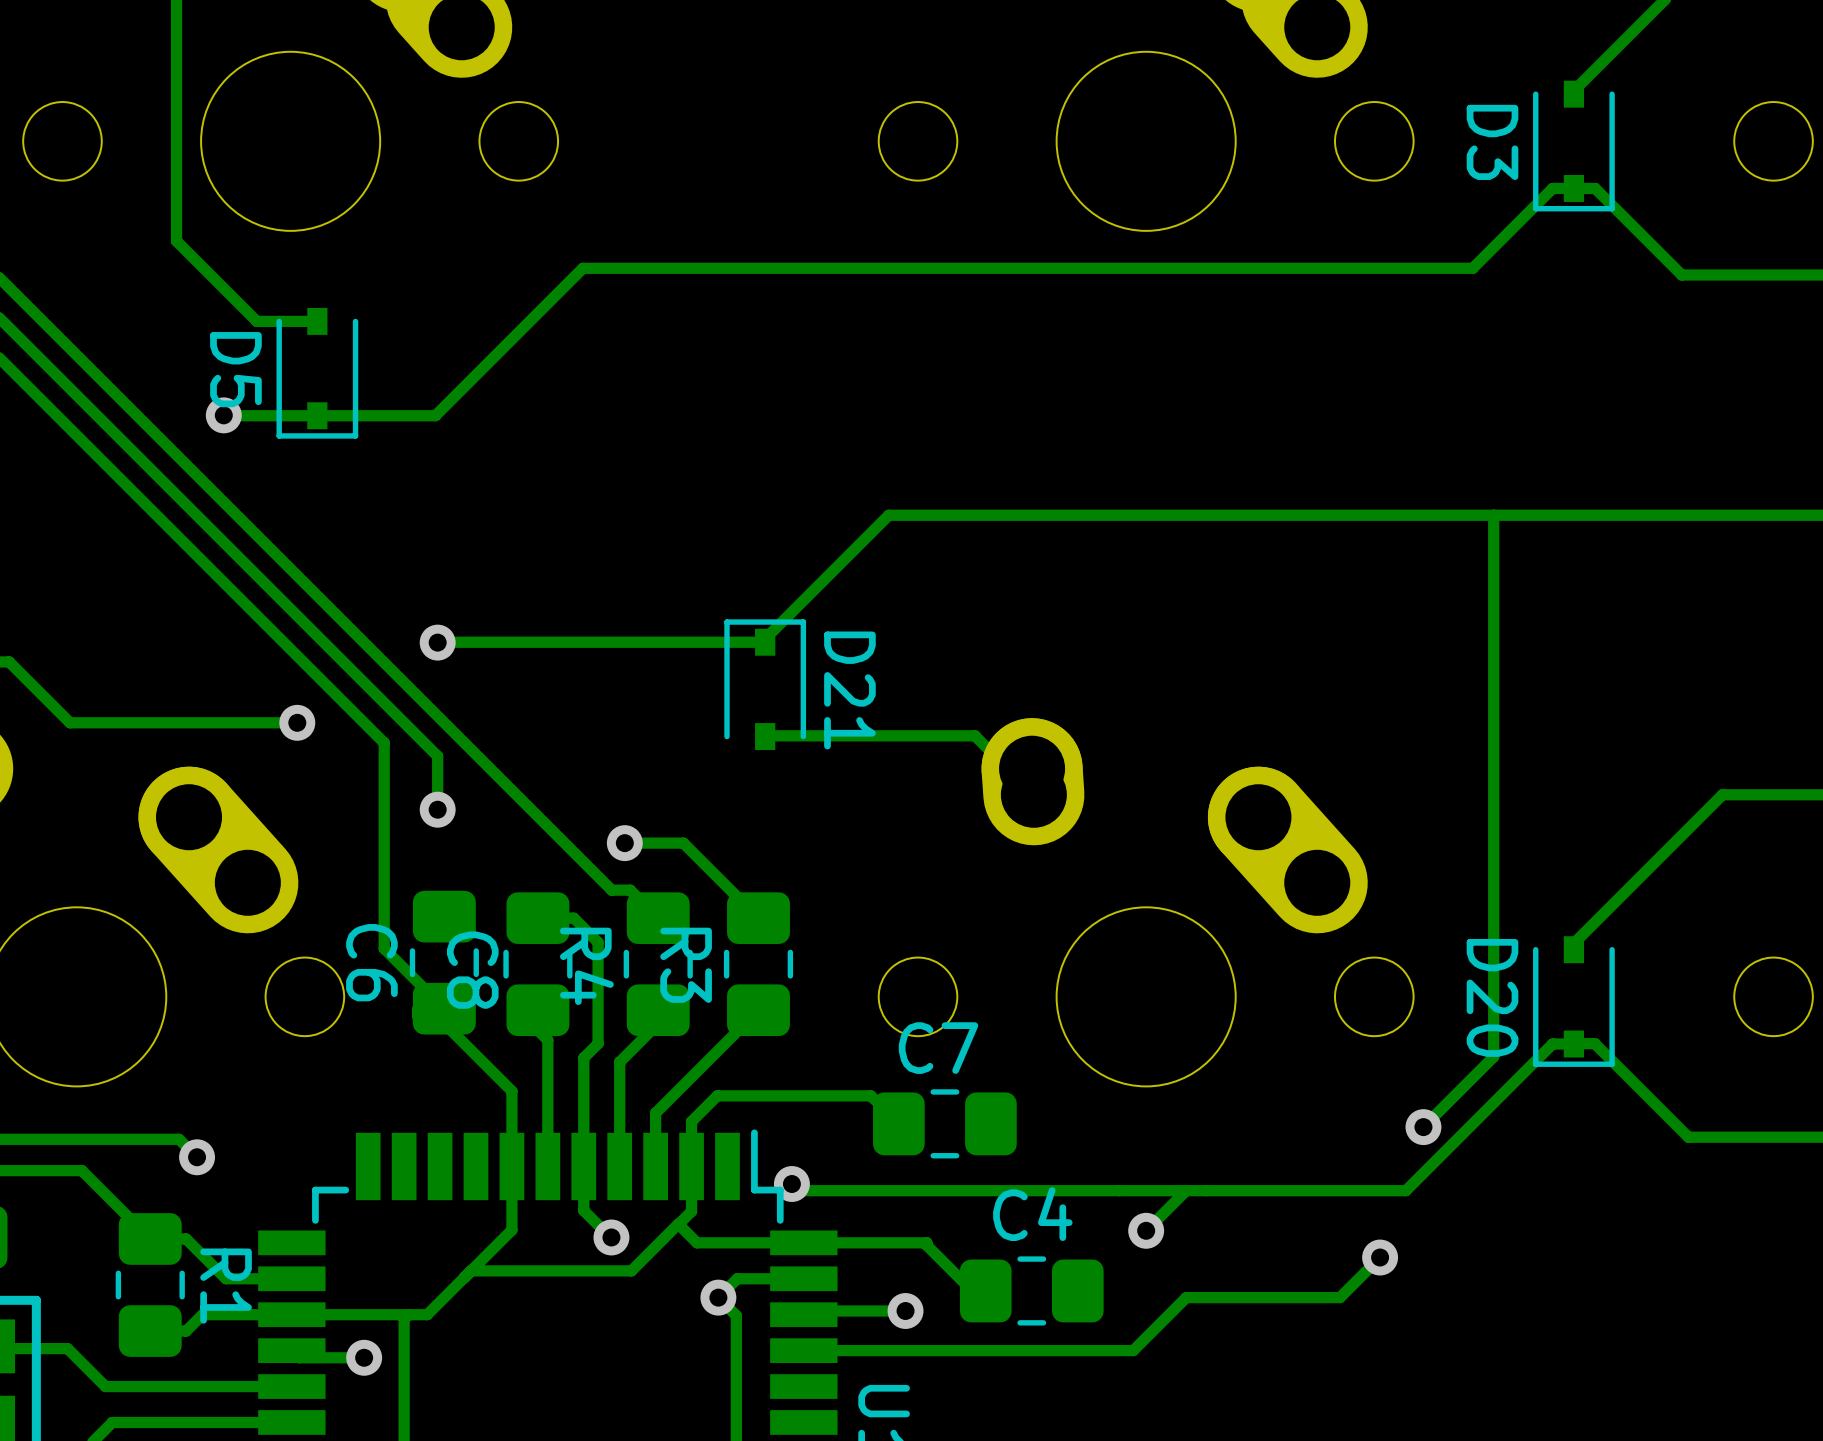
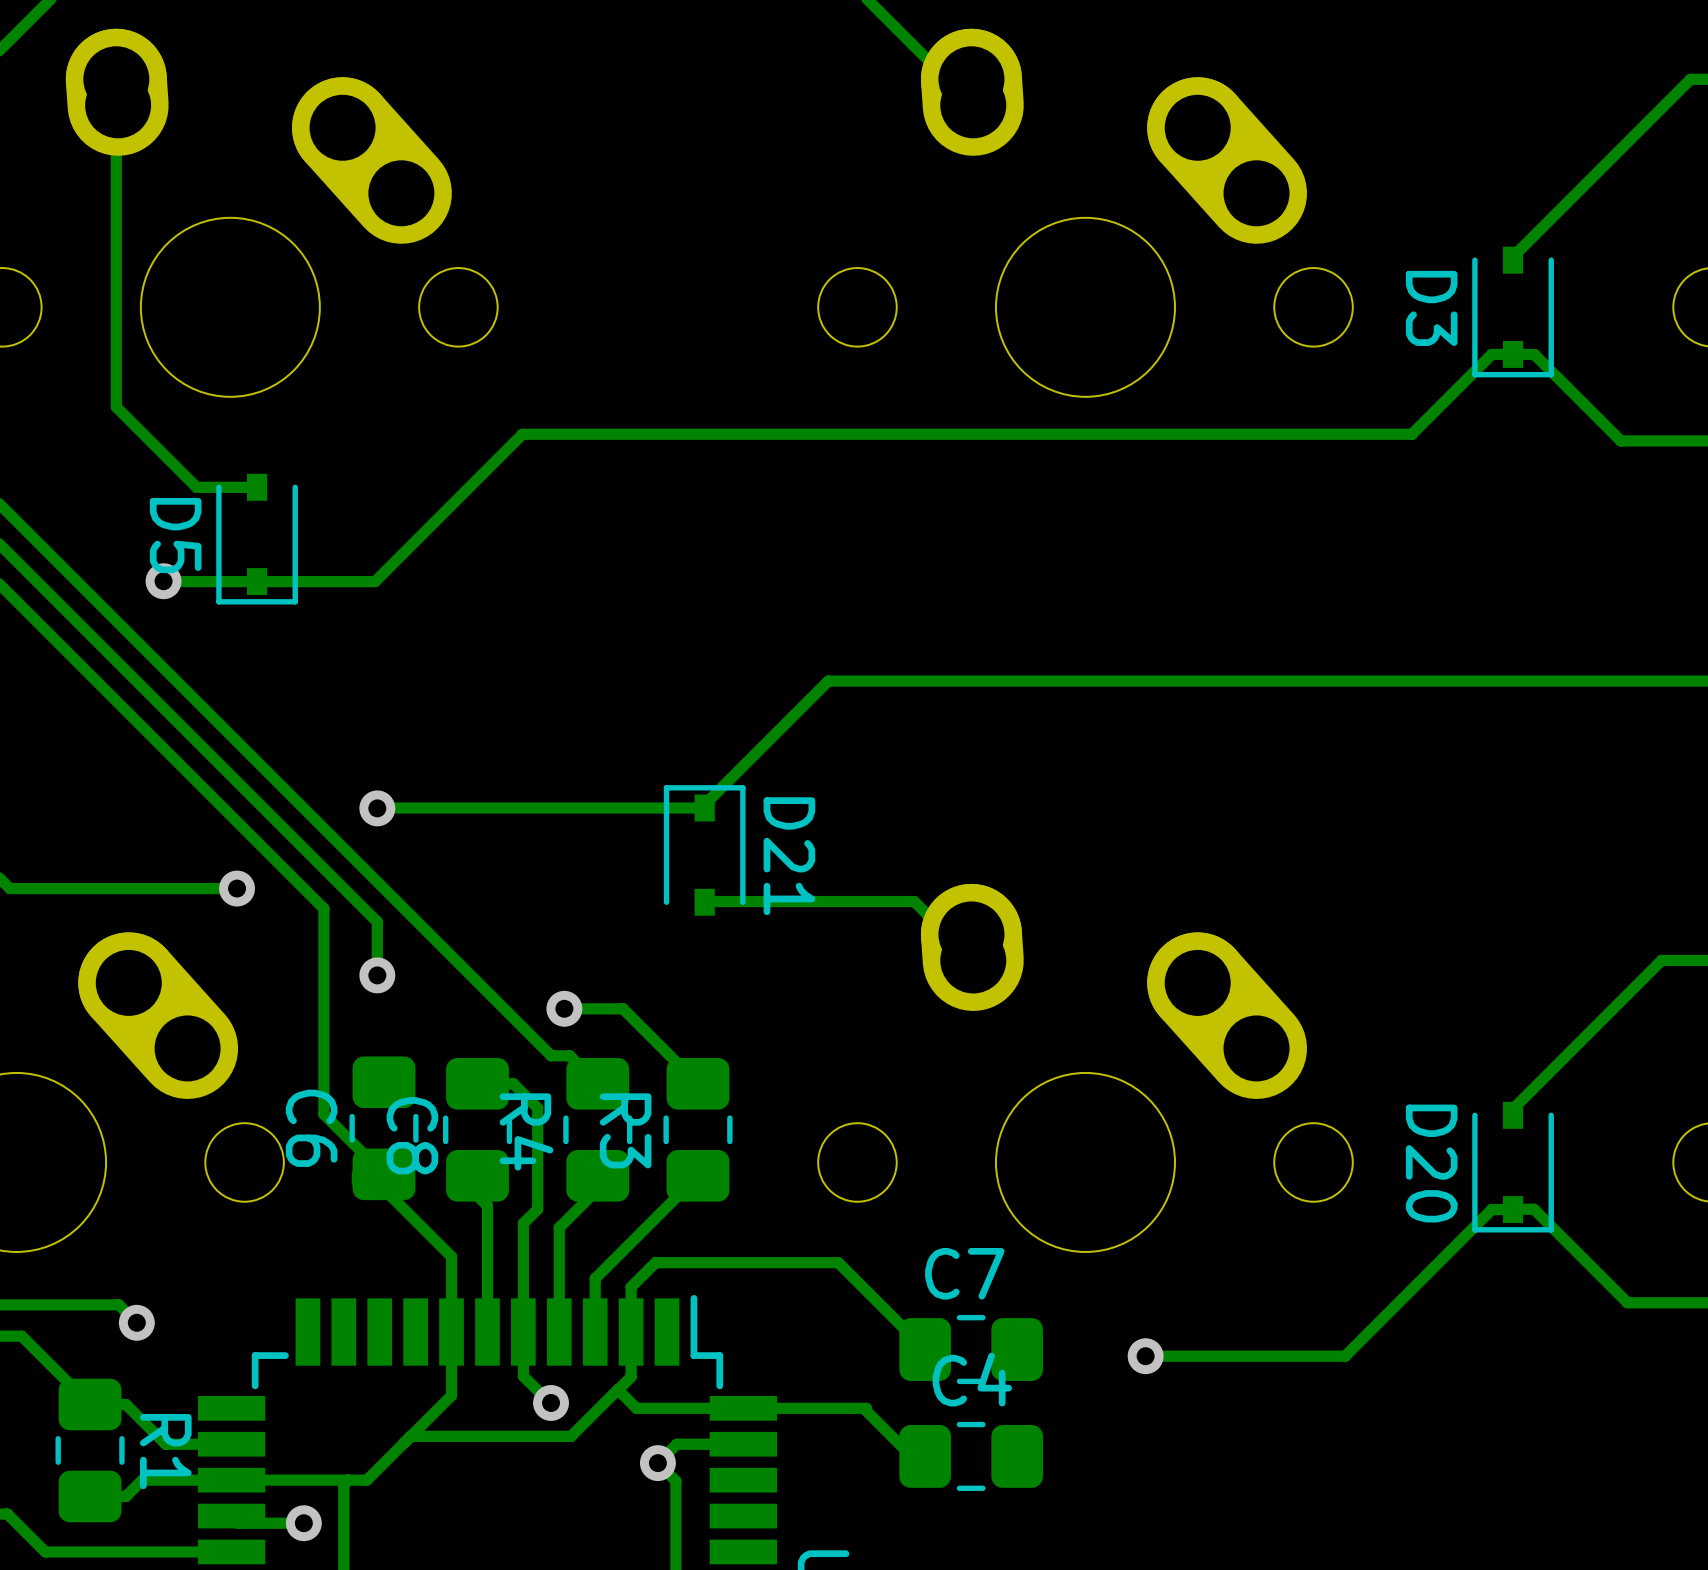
track: (1493, 515) (1493, 1056) (1423, 1127) -> none
track: (716, 1097) (870, 1095) (898, 1123) -> (655, 1262) (838, 1262) (925, 1349)
C7 position: (944, 1123) -> (971, 1349)
via: (1423, 1127) -> none
track: (791, 1184) (798, 1190) (1206, 1190) -> none
via: (791, 1184) -> none
track: (1186, 1190) (1146, 1230) -> none
via position: (1146, 1230) -> (1145, 1356)
track: (1380, 1257) (1339, 1297) (1186, 1297) (1133, 1350) (803, 1350) -> none
via: (1380, 1257) -> none
track: (905, 1311) (807, 1311) (803, 1314) -> none
via: (905, 1311) -> none

